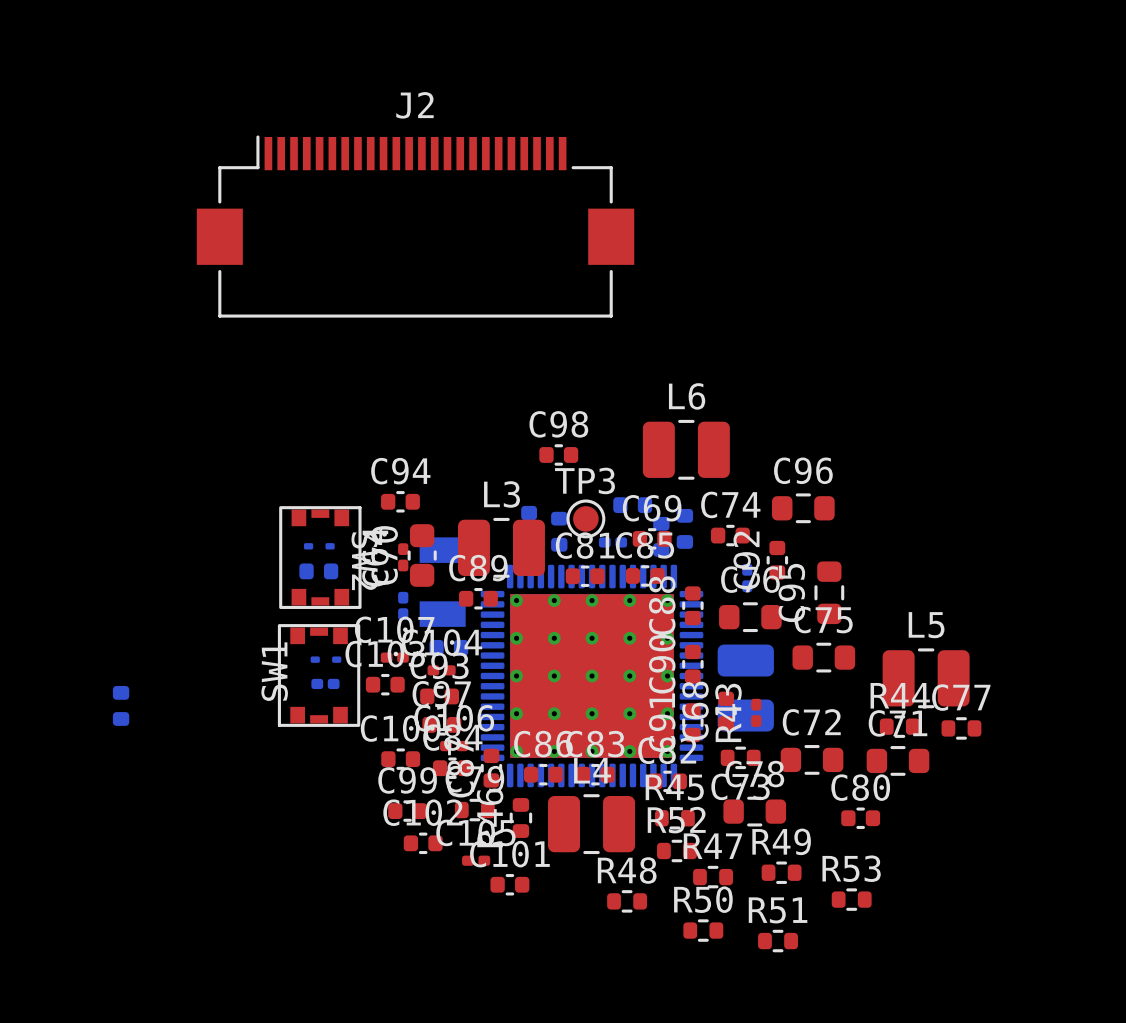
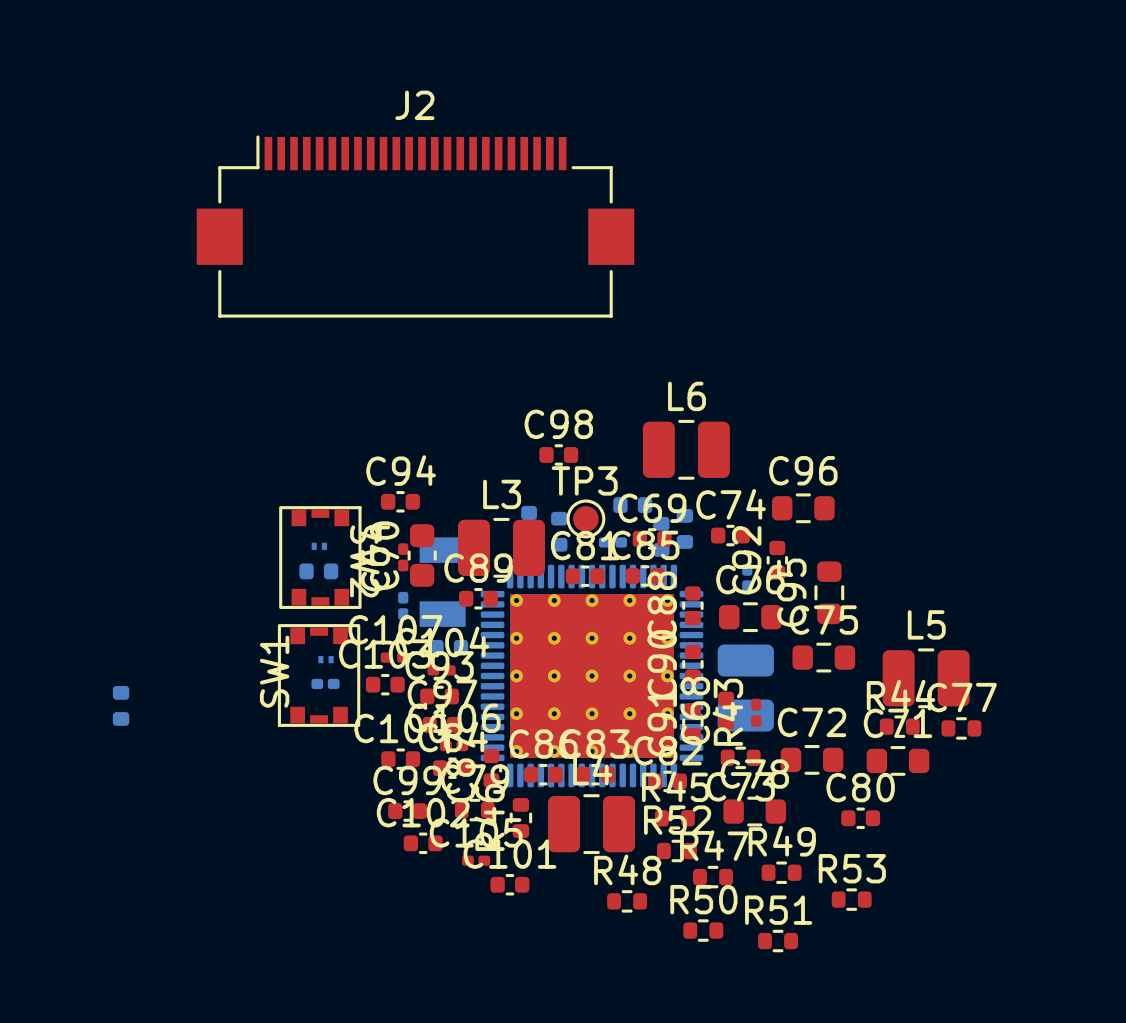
part footprint: [303, 543, 335, 550] -> [311, 542, 328, 550]
part footprint: [310, 656, 342, 663] -> [318, 656, 334, 664]

